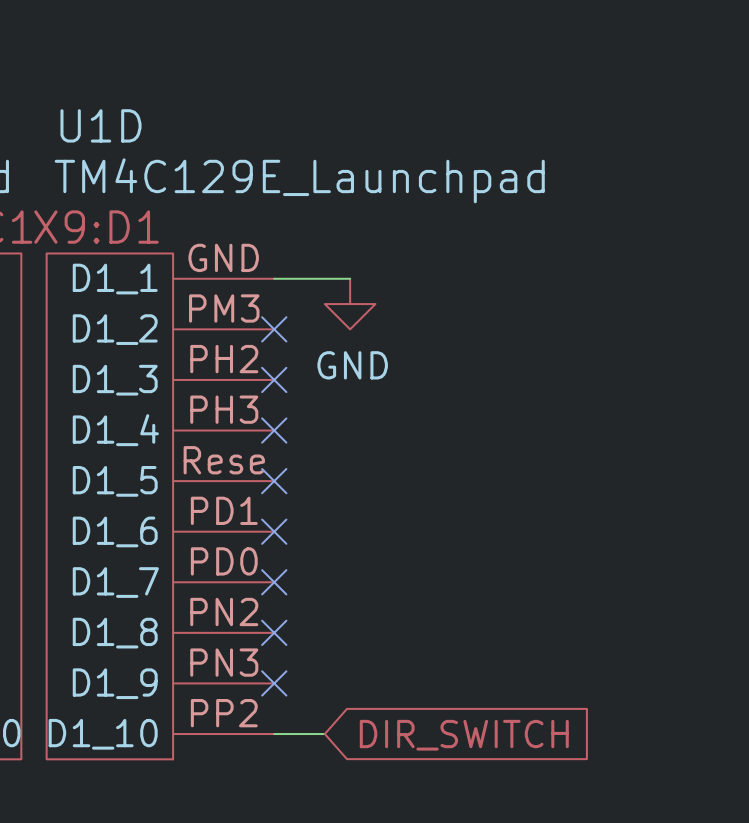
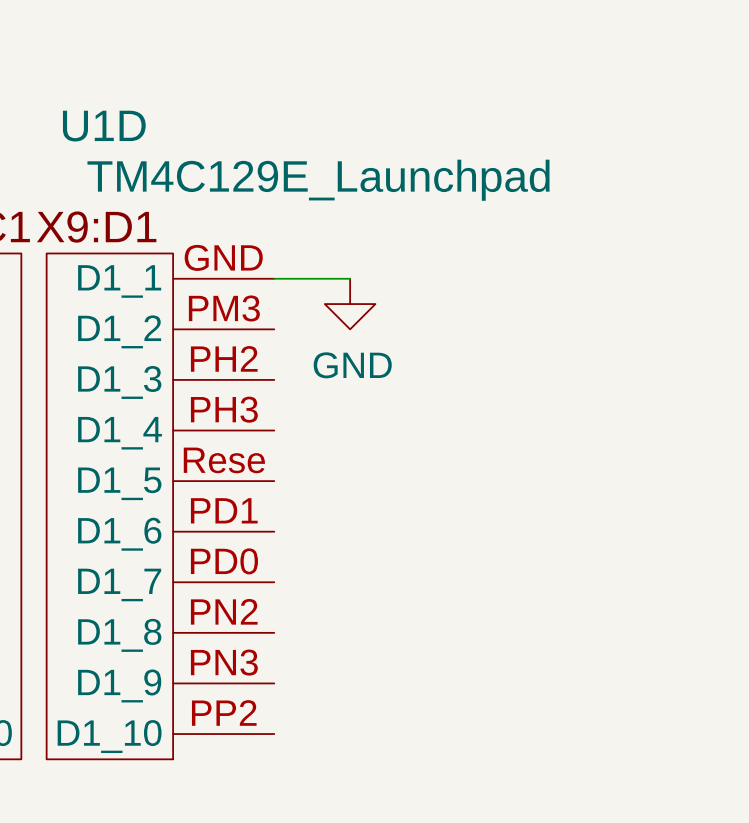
no-connect mark: (274, 329) -> none
no-connect mark: (274, 379) -> none
no-connect mark: (274, 430) -> none
no-connect mark: (274, 481) -> none
no-connect mark: (274, 531) -> none
no-connect mark: (274, 582) -> none
no-connect mark: (274, 632) -> none
no-connect mark: (274, 683) -> none
wire: (274, 734) (324, 734) -> none
global label: DIR_SWITCH (464, 735) -> none

